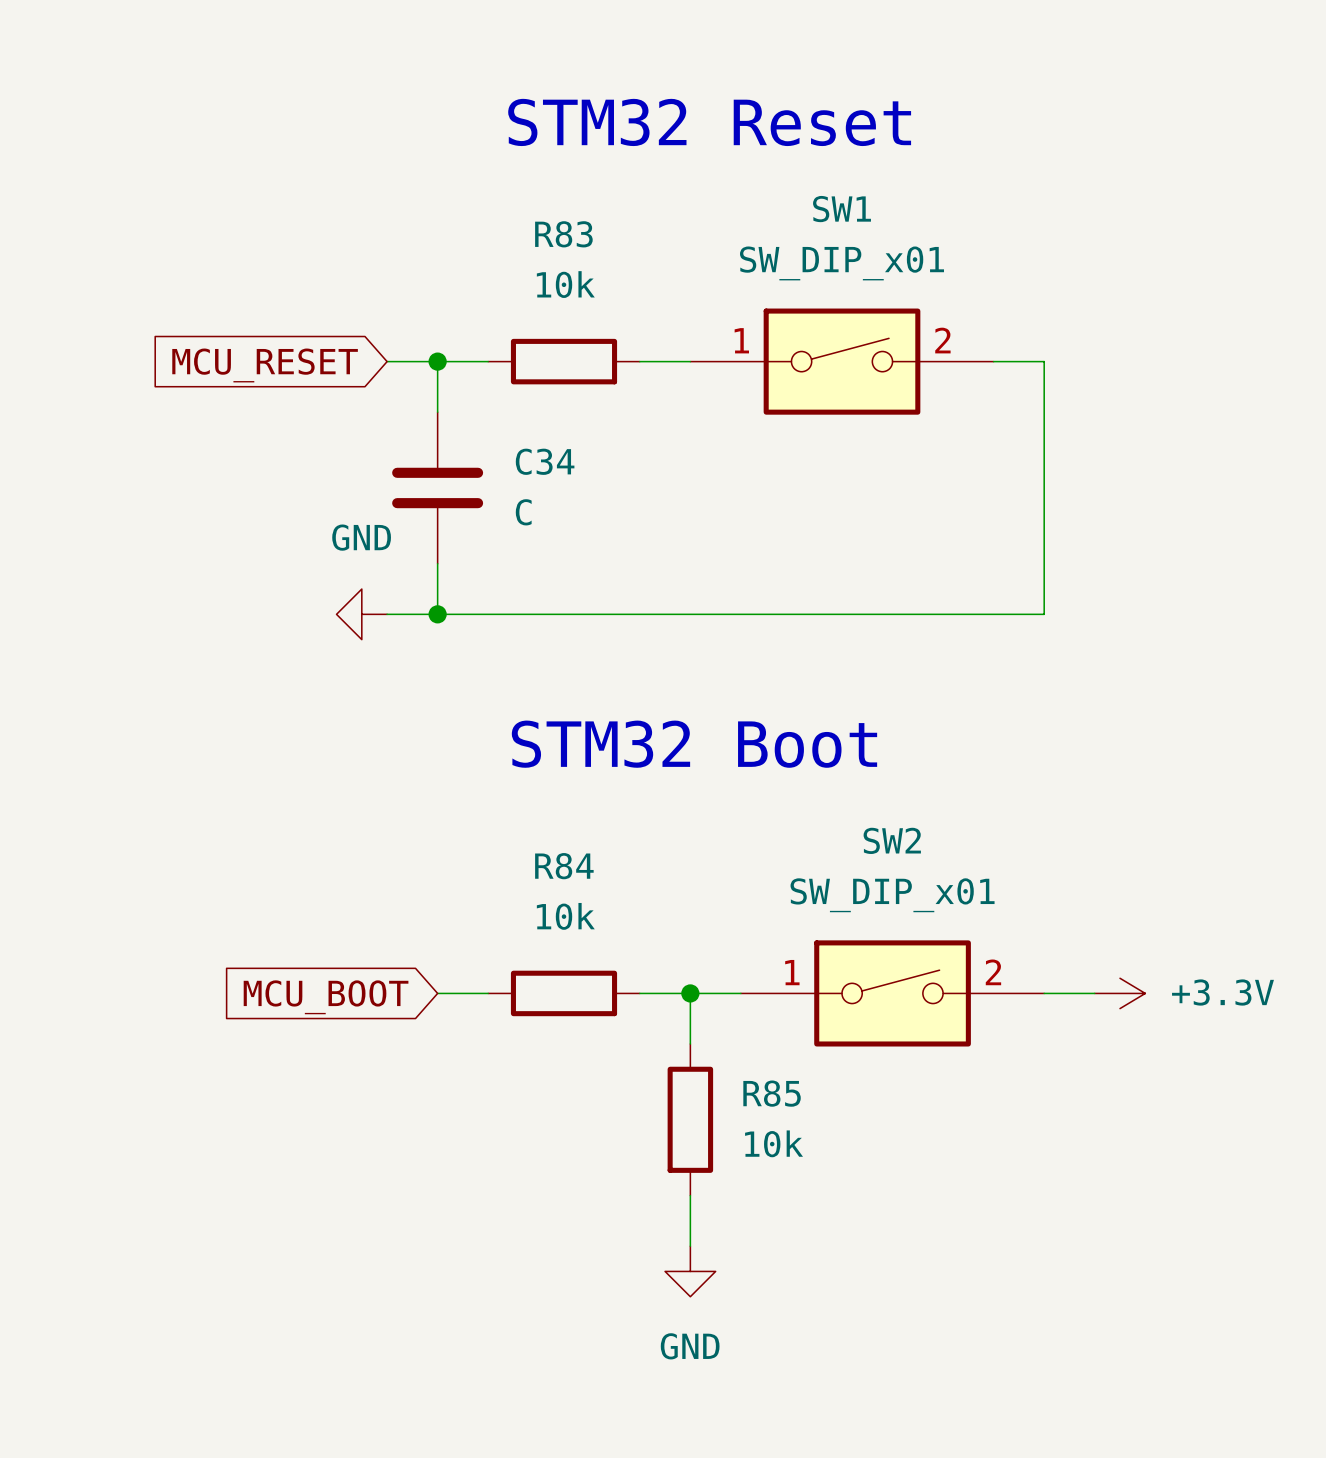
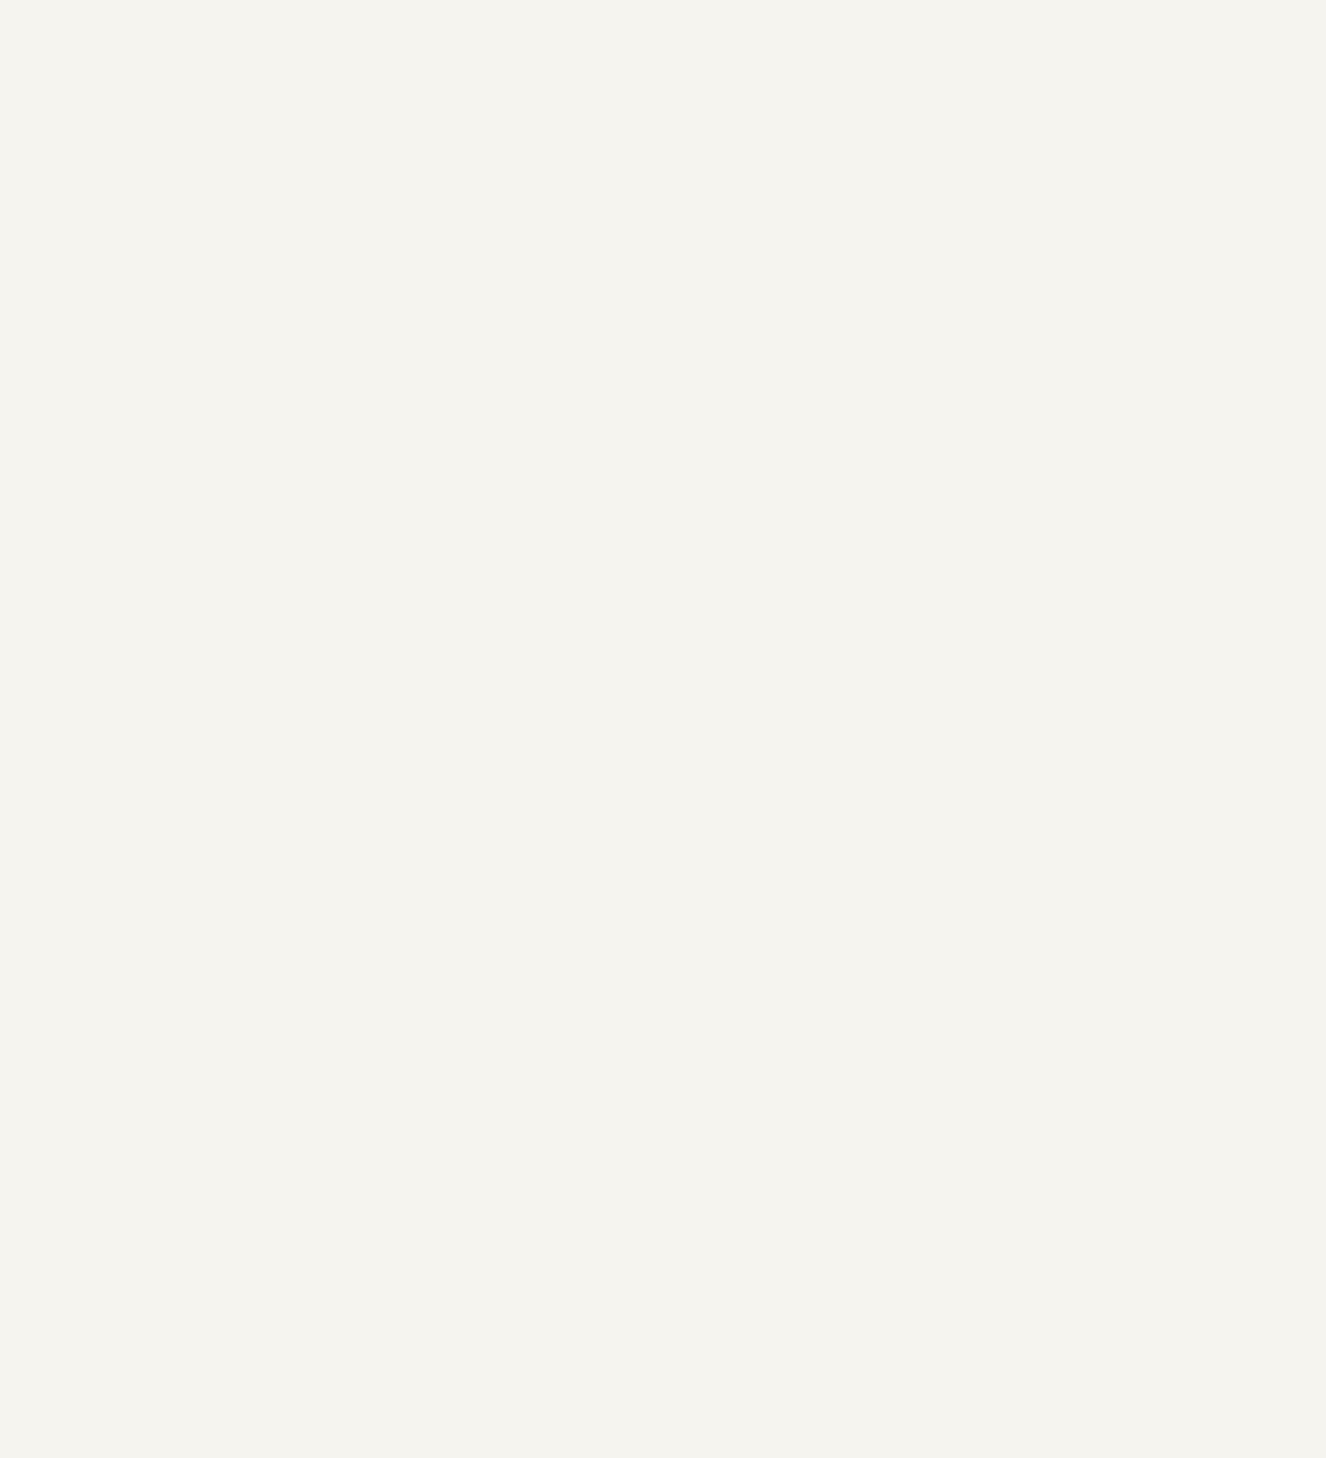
text: STM32 Reset (709, 122) -> none
wire: (387, 361) (488, 361) -> none
wire: (437, 361) (437, 412) -> none
junction: (437, 361) -> none
R83: 10k (564, 361) -> none
wire: (639, 361) (690, 361) -> none
SW1: SW_DIP_x01 (842, 361) -> none
wire: (993, 361) (1044, 361) (1044, 614) (387, 614) -> none
global label: MCU_RESET (265, 365) -> none
C34: C (437, 487) -> none
wire: (437, 563) (437, 614) -> none
power symbol: GND (361, 614) -> none
junction: (437, 614) -> none
text: STM32 Boot (694, 744) -> none
wire: (437, 993) (488, 993) -> none
R84: 10k (564, 993) -> none
wire: (639, 993) (740, 993) -> none
wire: (690, 993) (690, 1043) -> none
junction: (690, 993) -> none
SW2: SW_DIP_x01 (892, 993) -> none
wire: (1044, 993) (1094, 993) -> none
power symbol: +3.3V (1120, 993) -> none
global label: MCU_BOOT (326, 997) -> none
R85: 10k (690, 1119) -> none
wire: (690, 1195) (690, 1246) -> none
power symbol: GND (690, 1271) -> none

